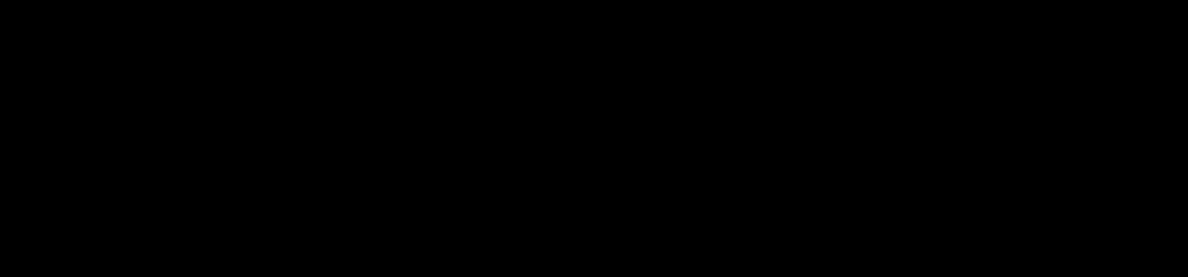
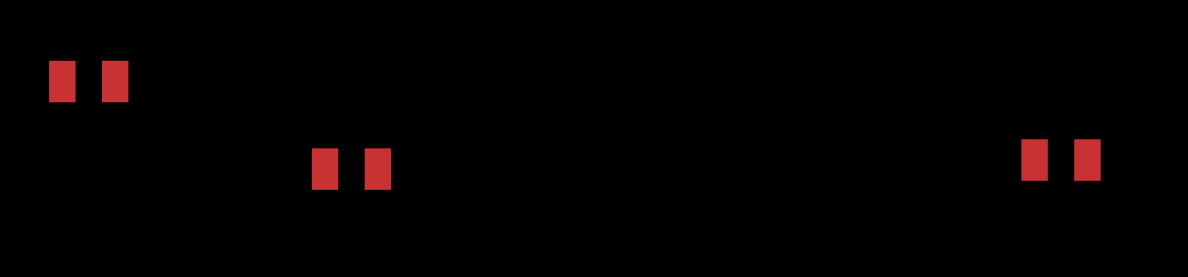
part: none -> (88, 81)
part: none -> (1061, 160)
part: none -> (351, 169)

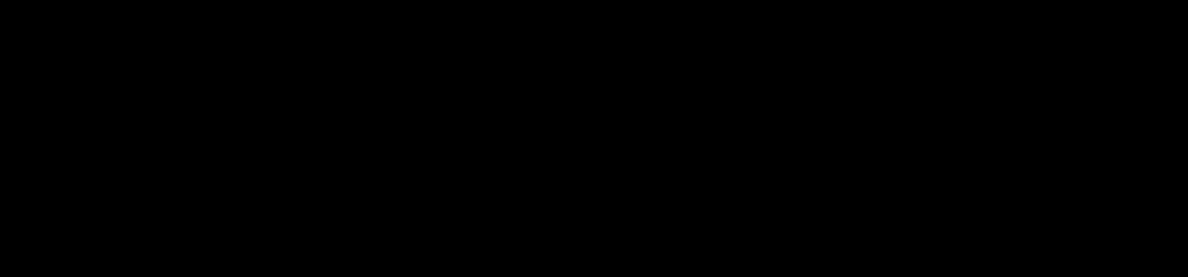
part: (88, 81) -> none
part: (1061, 160) -> none
part: (351, 169) -> none

